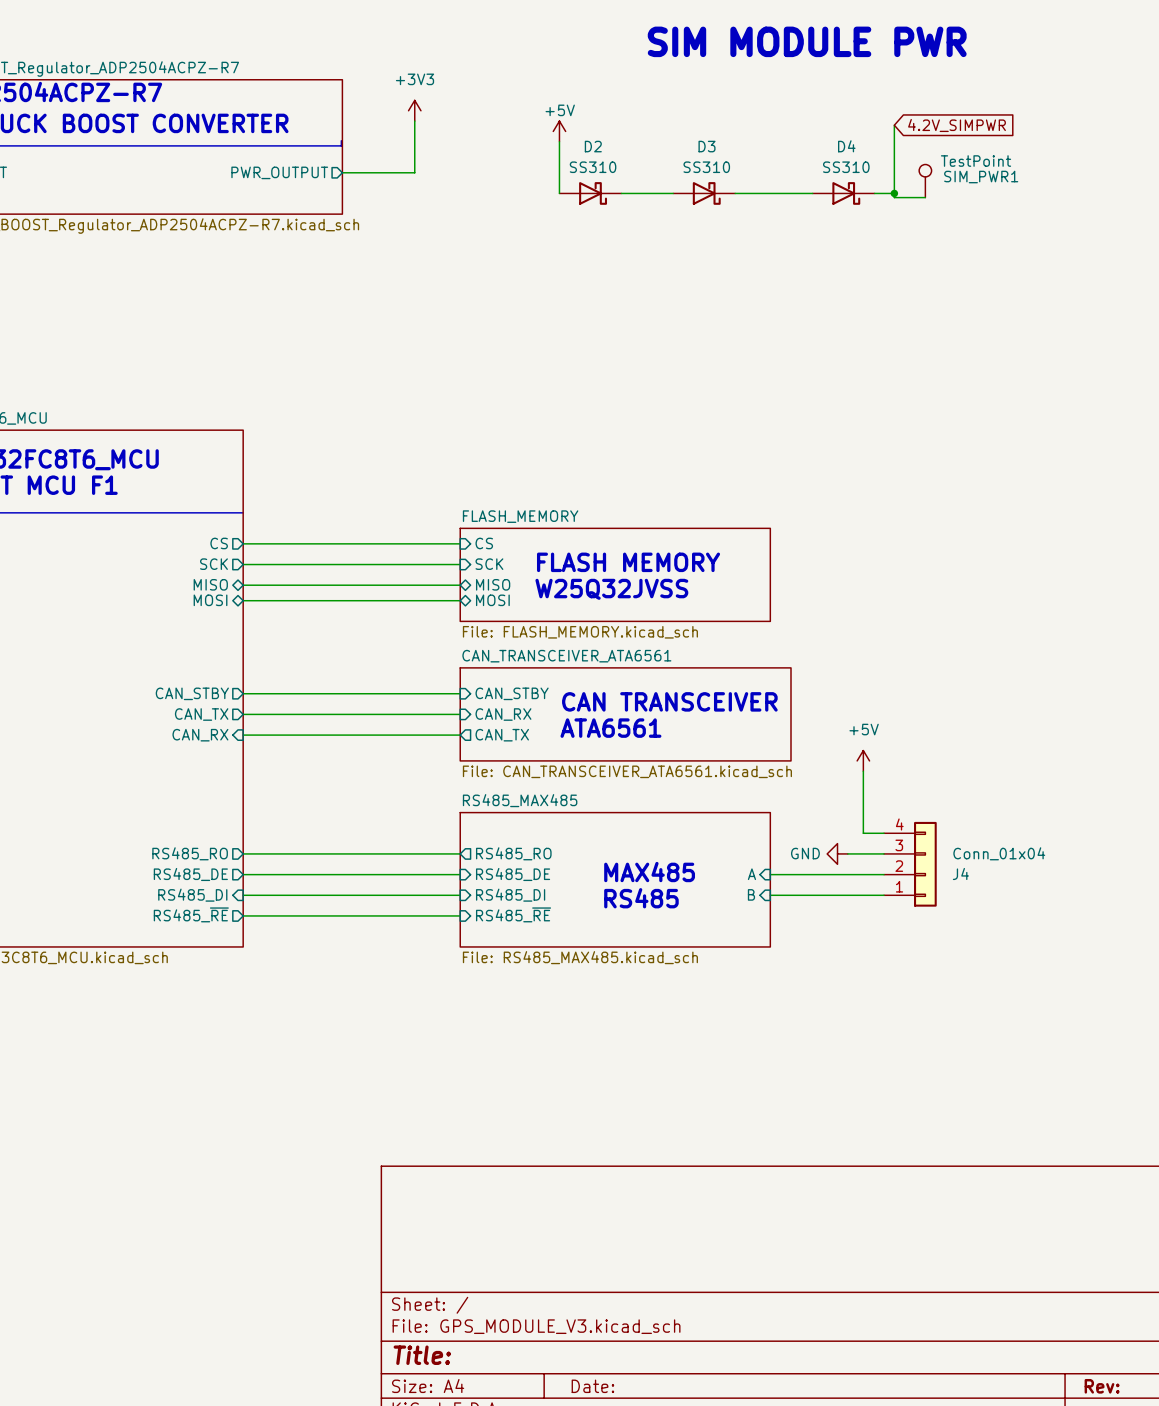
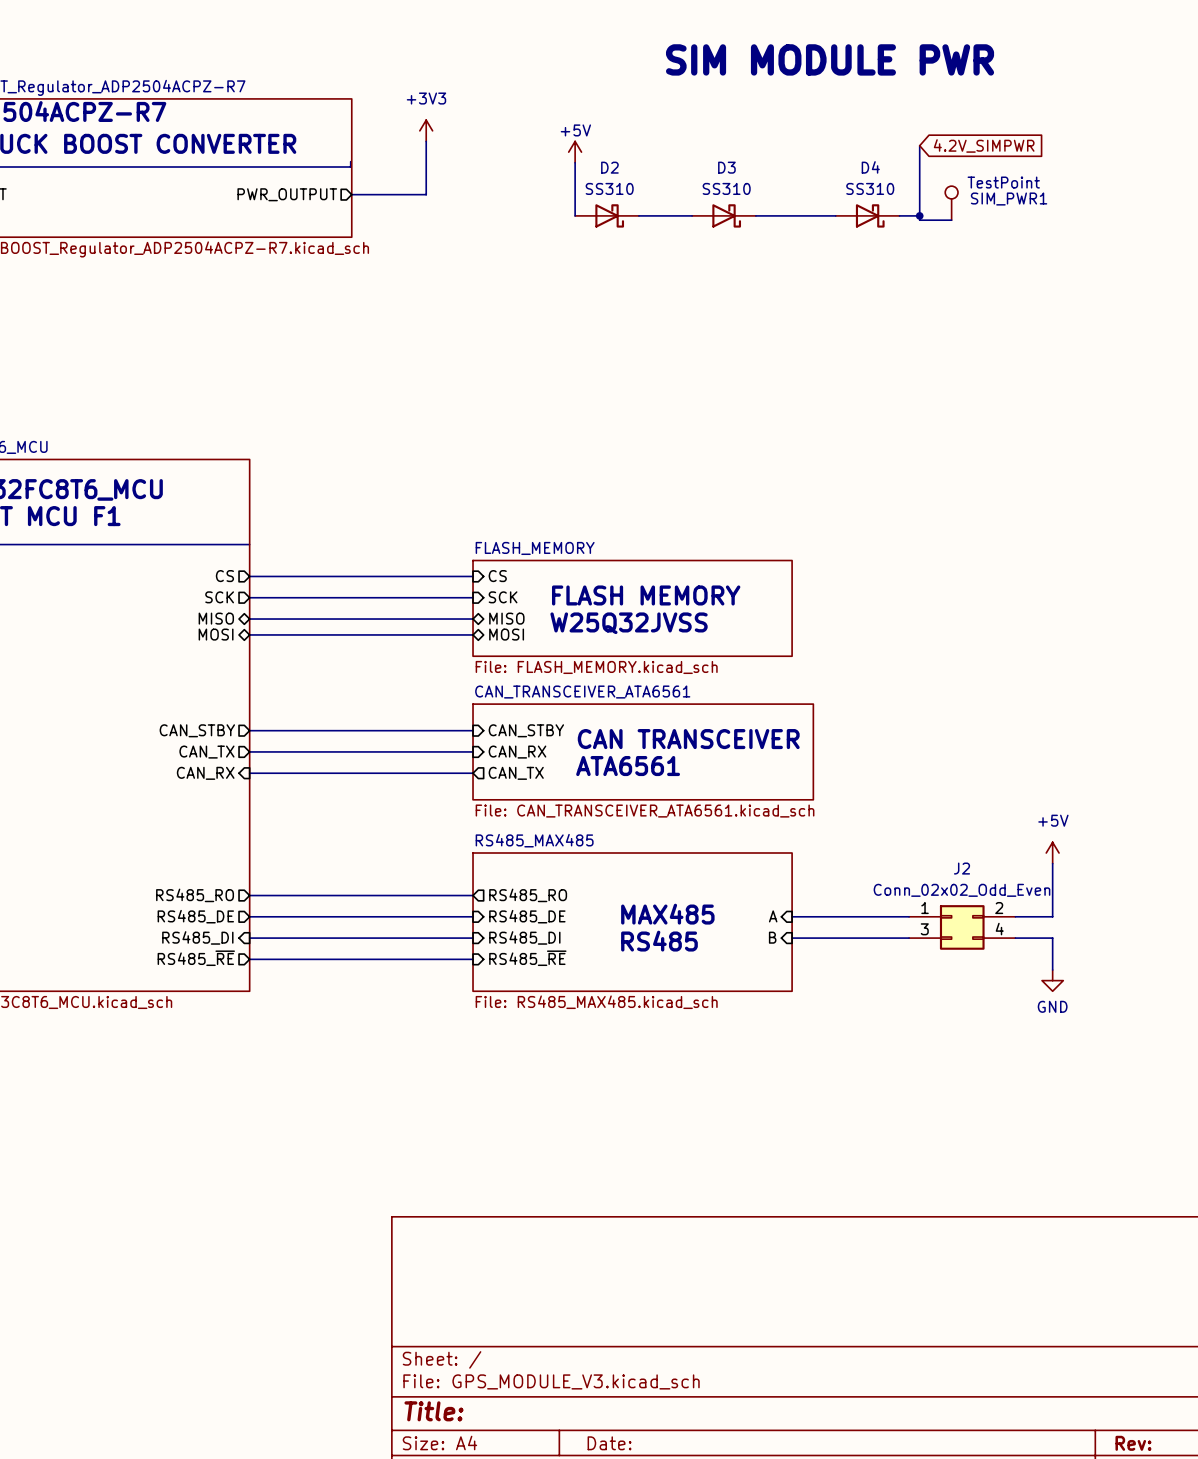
power symbol position: +5V (863, 760) -> +5V (1052, 852)
wire: (863, 771) (863, 833) (884, 833) -> none
wire: none -> (1052, 863) (1052, 916) (1015, 916)
power symbol: GND (837, 853) -> none
wire: (847, 853) (884, 853) -> none
J4: Conn_01x04 (910, 864) -> none
J2: none -> Conn_02x02_Odd_Even (962, 927)
wire: none -> (1015, 938) (1052, 938) (1052, 969)
power symbol: none -> GND (1052, 980)

